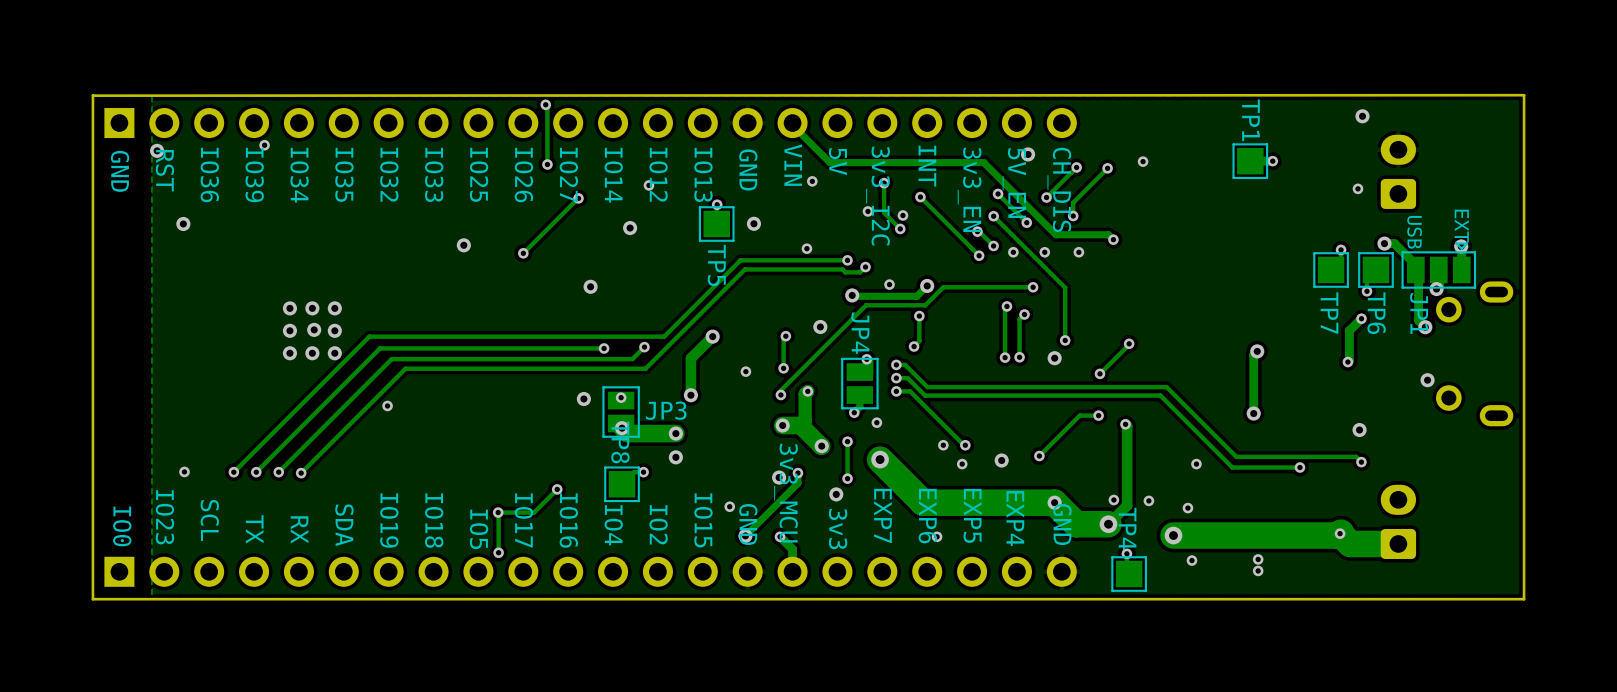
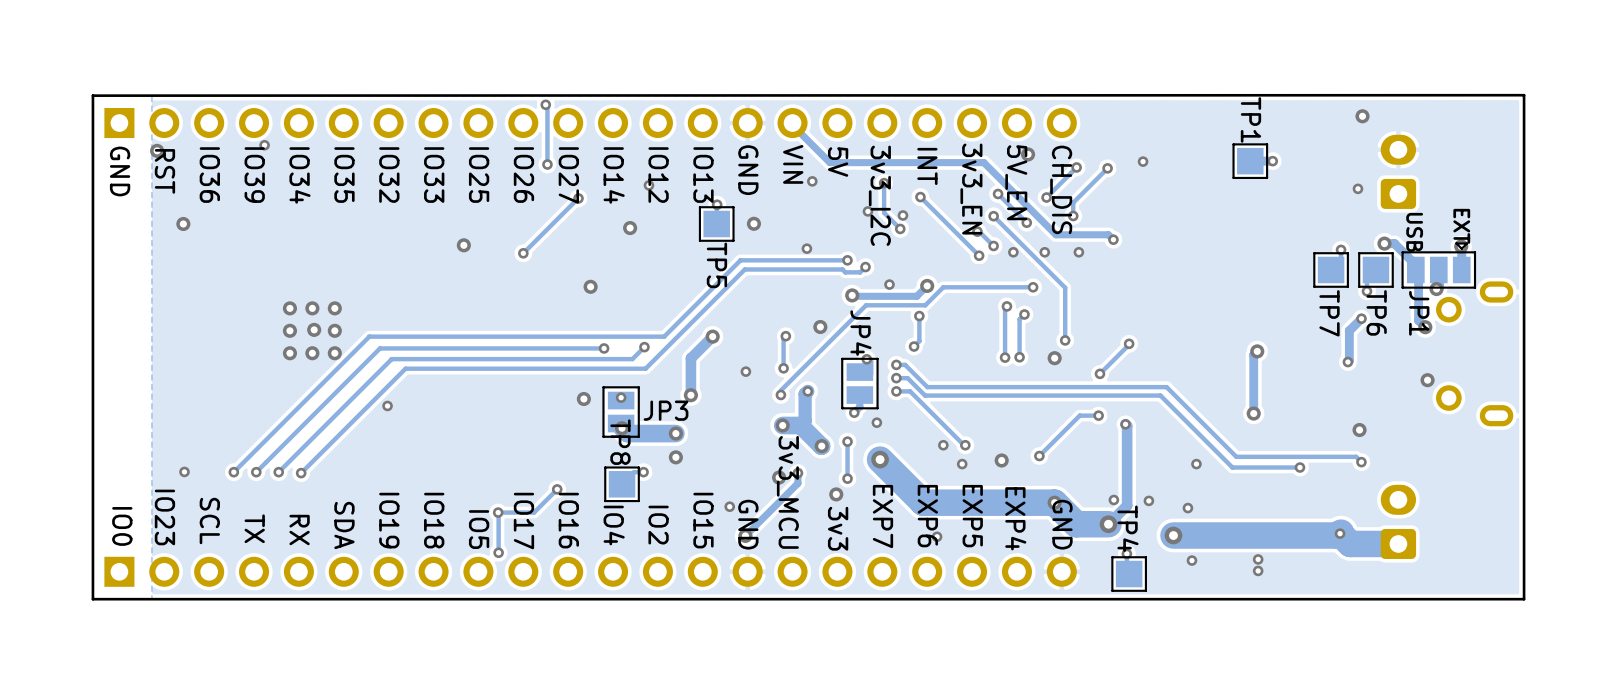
track: (780, 536) (792, 549) (792, 571) -> none
via: (780, 536) -> none

